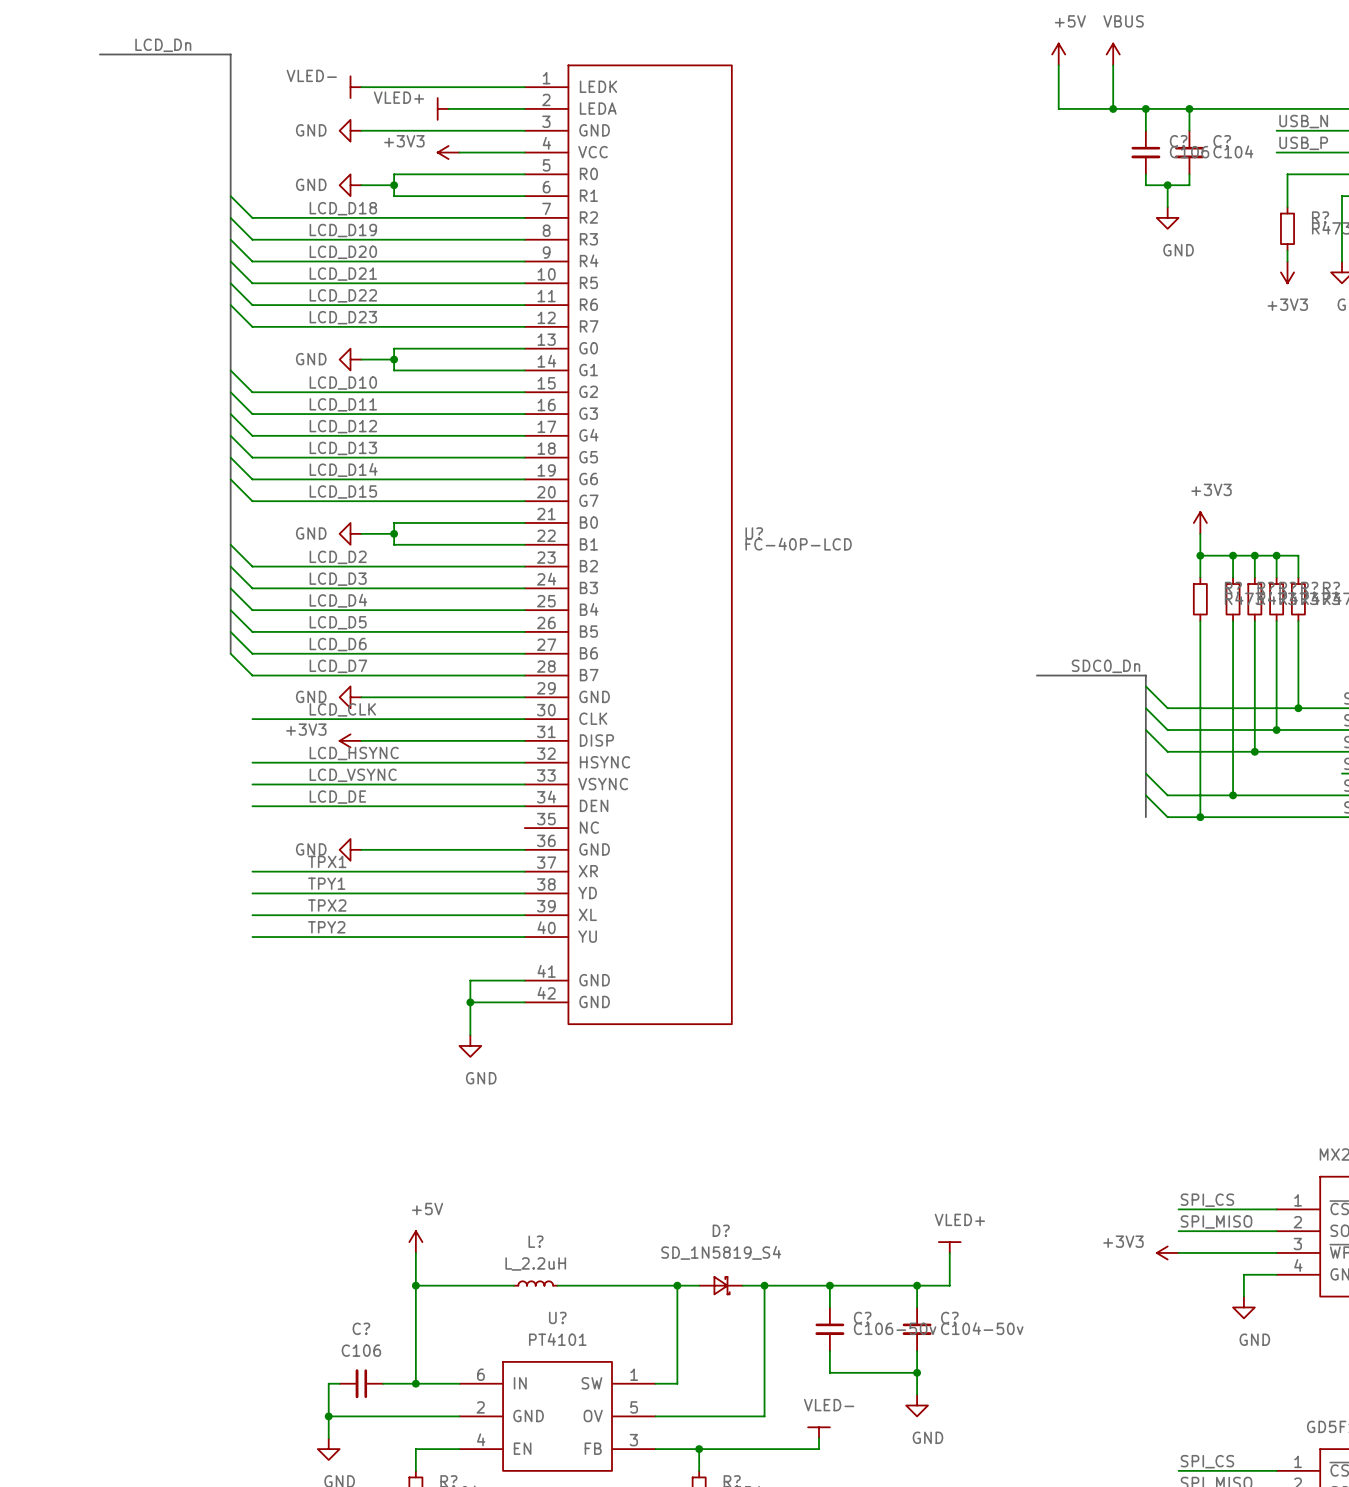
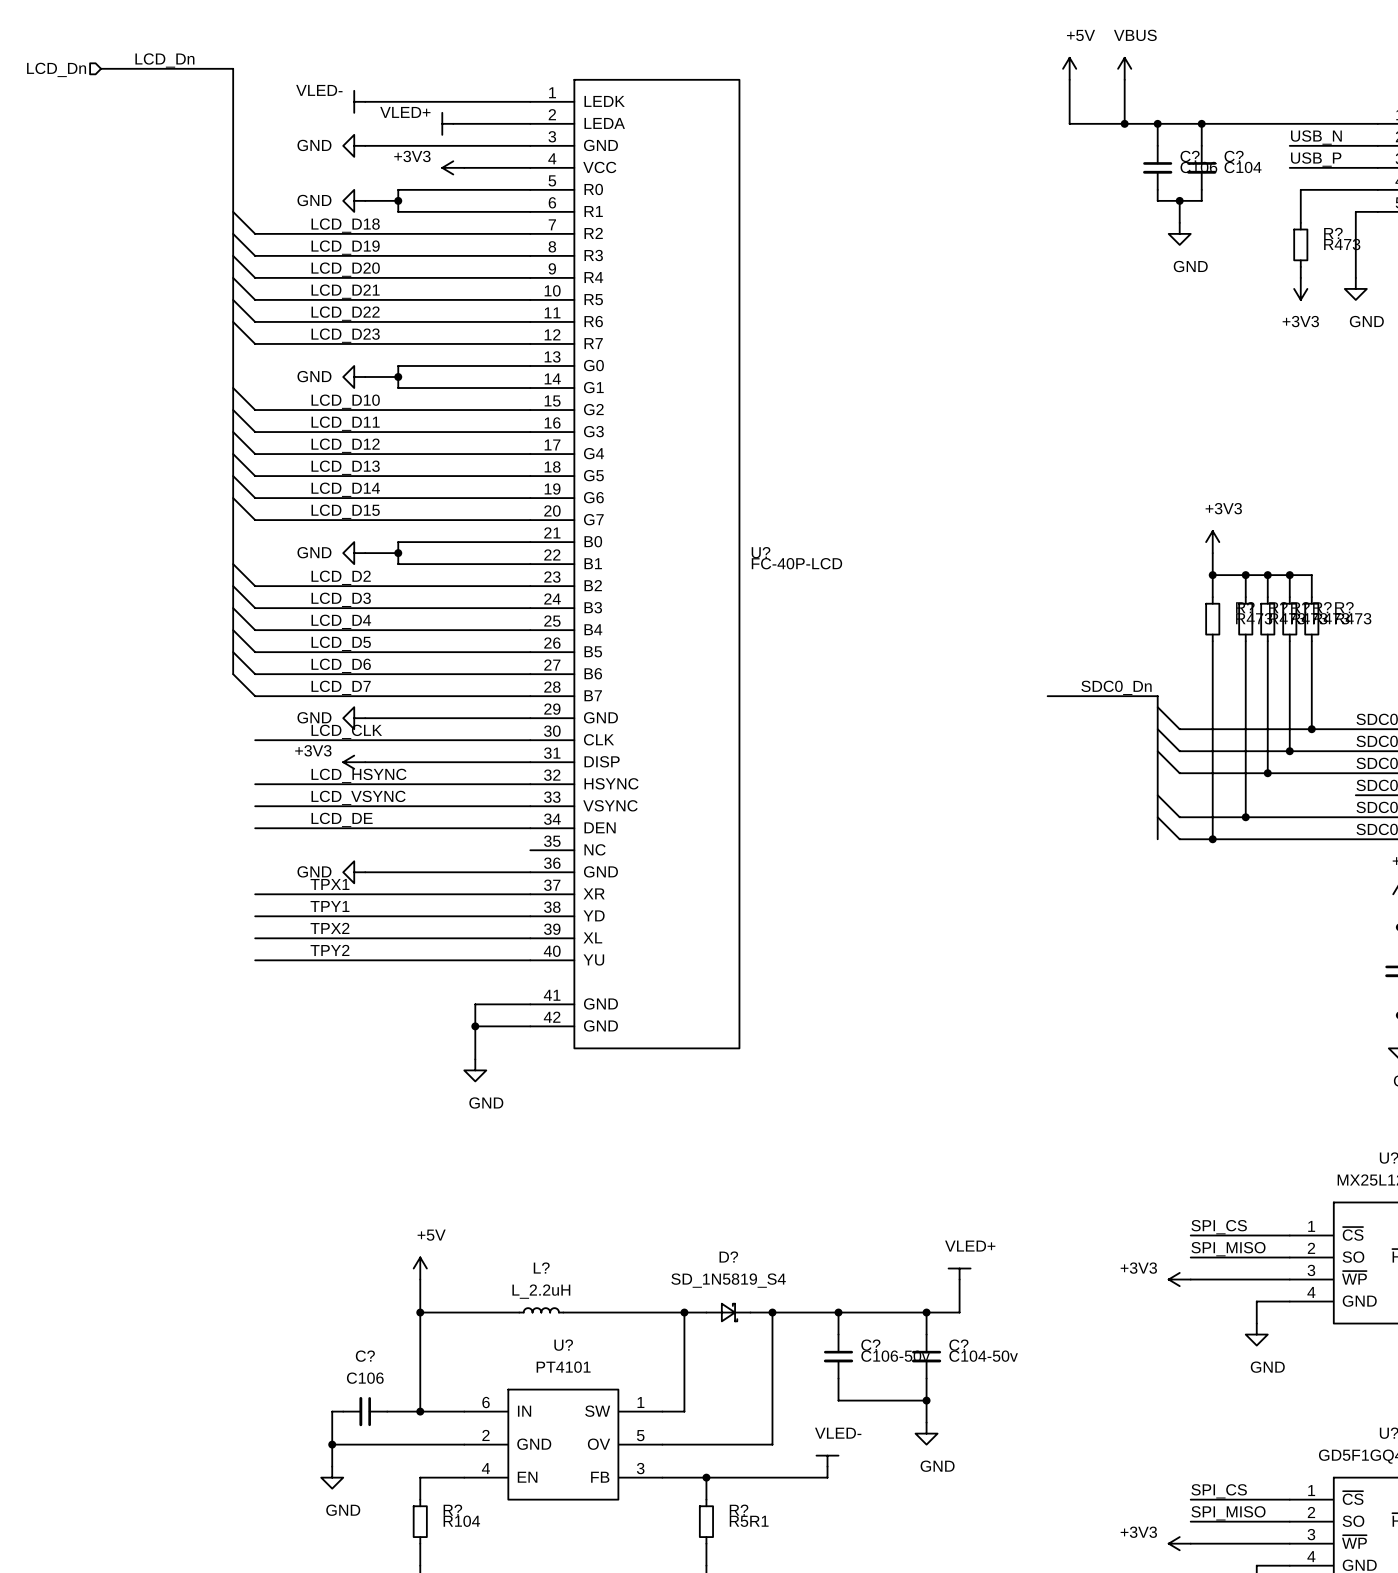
hierarchical label: none -> LCD_Dn (56, 69)

